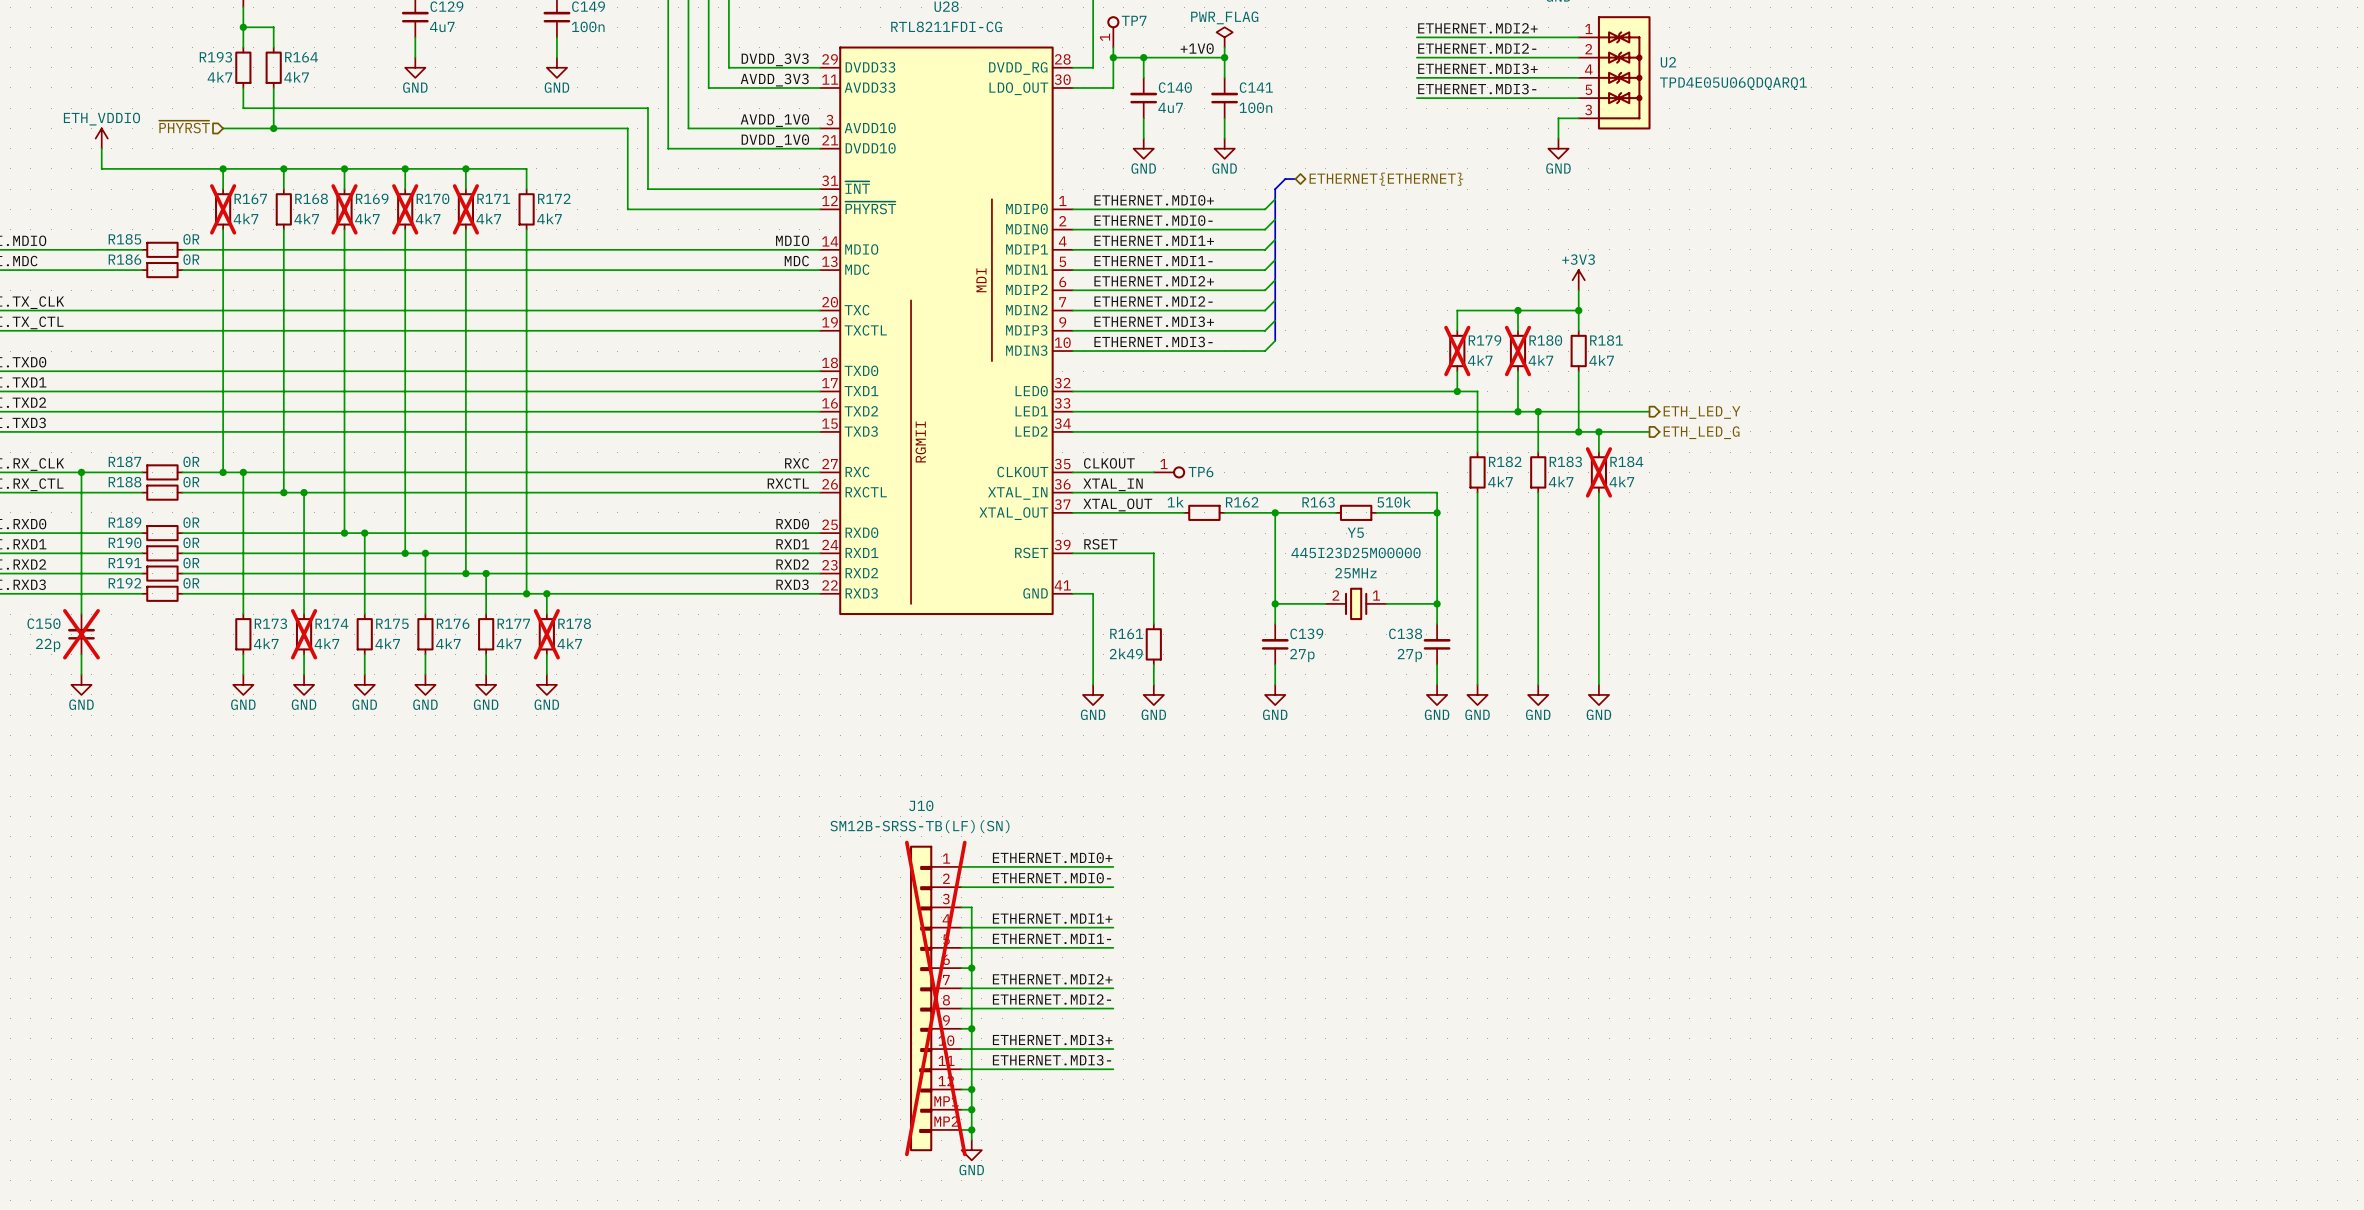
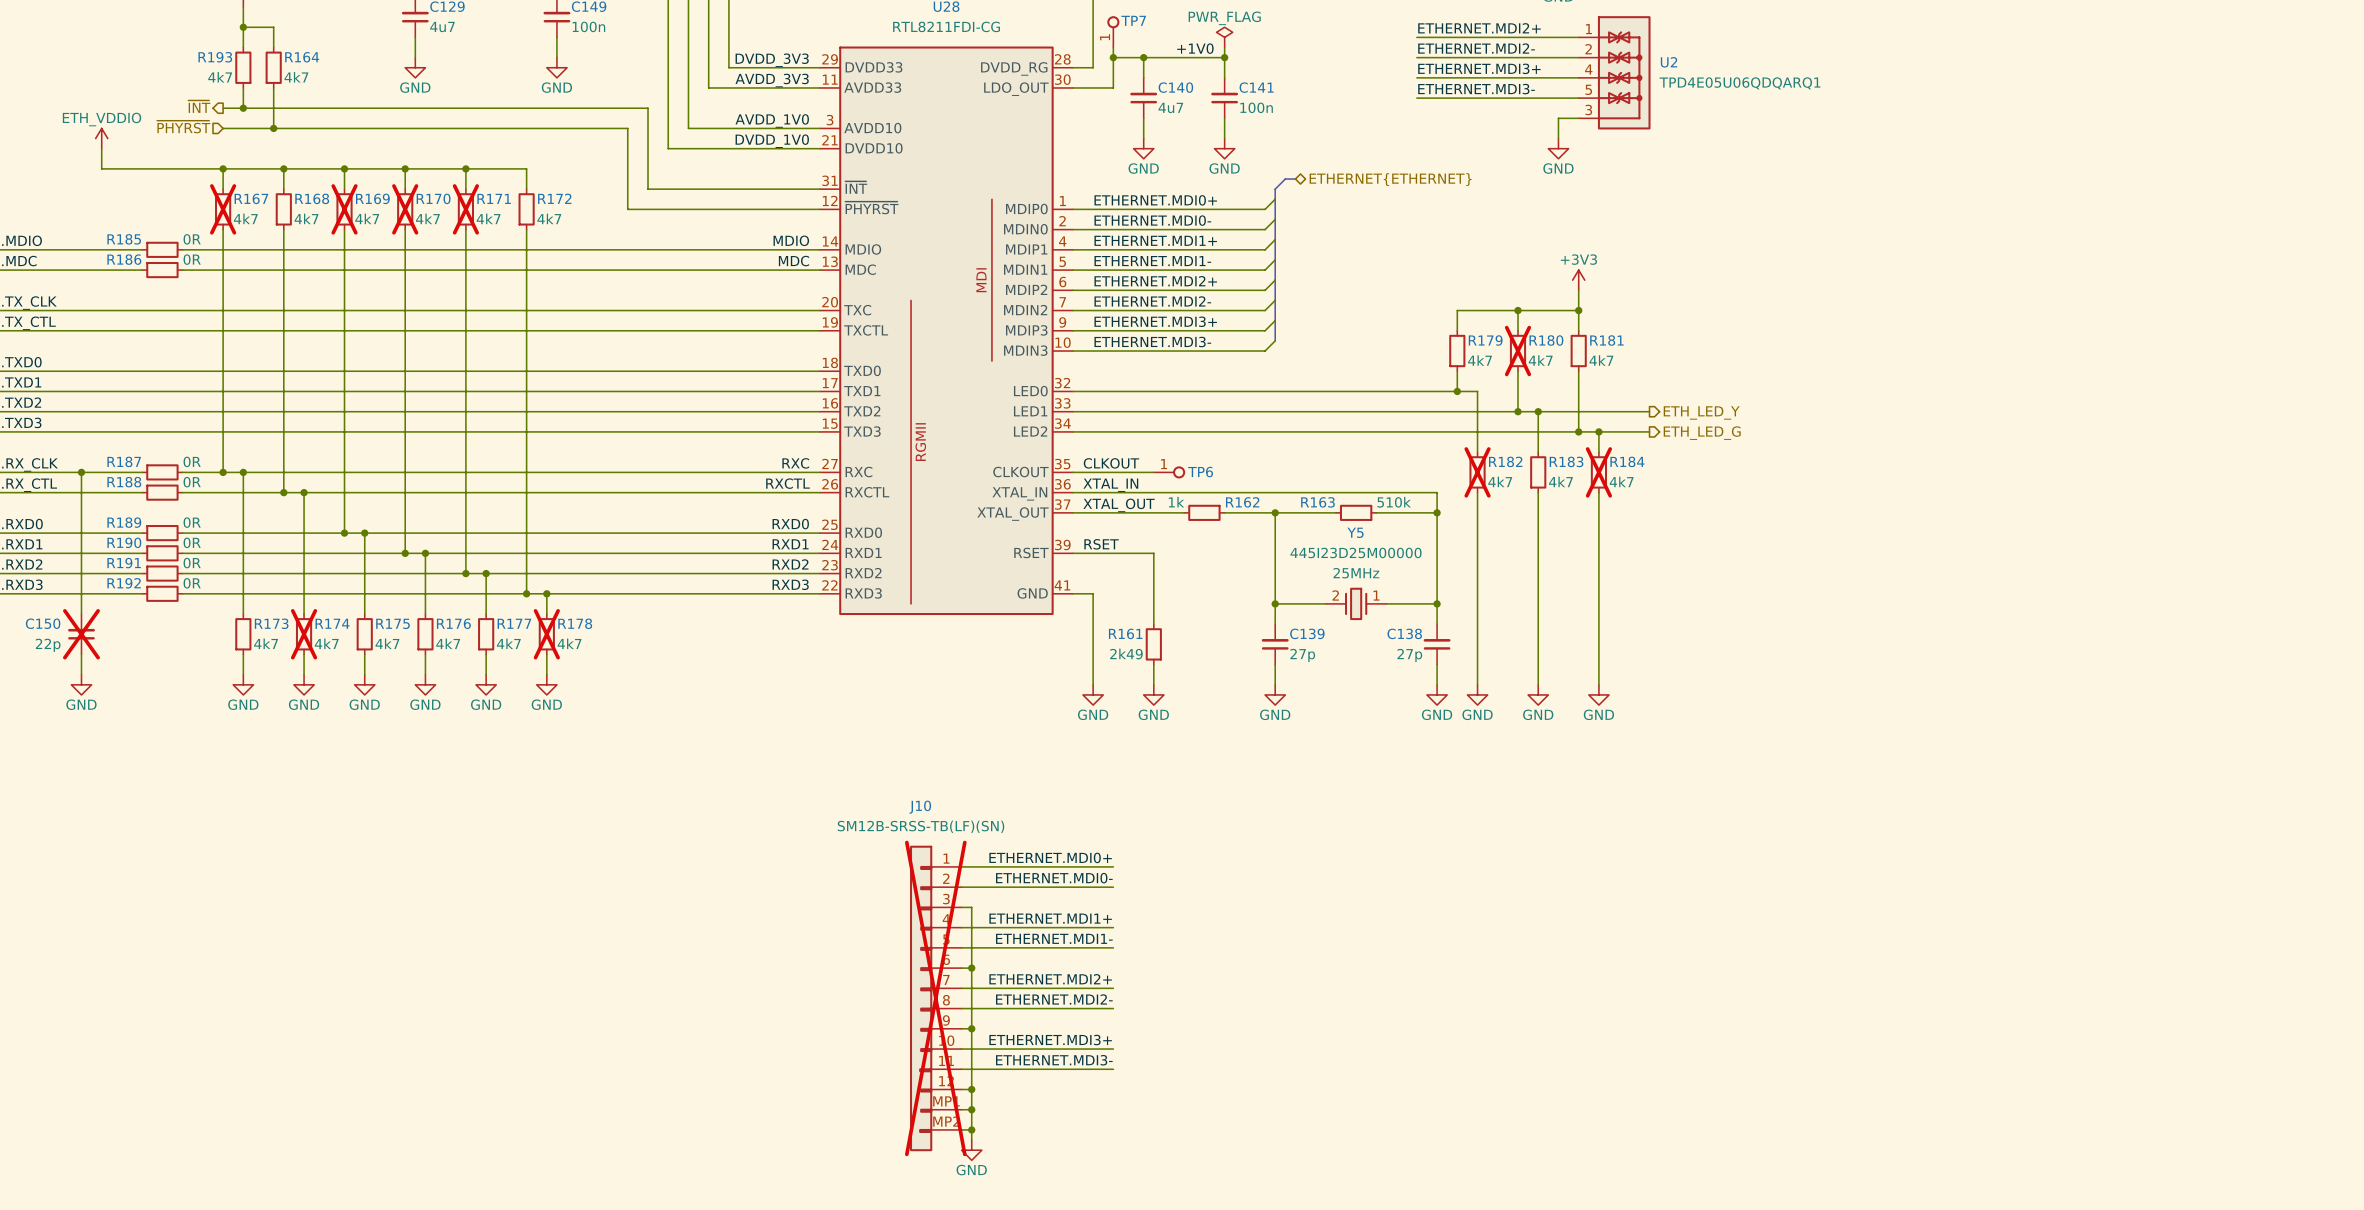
hierarchical label: none -> ~{INT} (199, 106)
wire: none -> (223, 108) (243, 108)
junction: none -> (243, 108)
R179 do-not-place cross: (1457, 351) -> none
R182 do-not-place cross: none -> (1477, 472)

